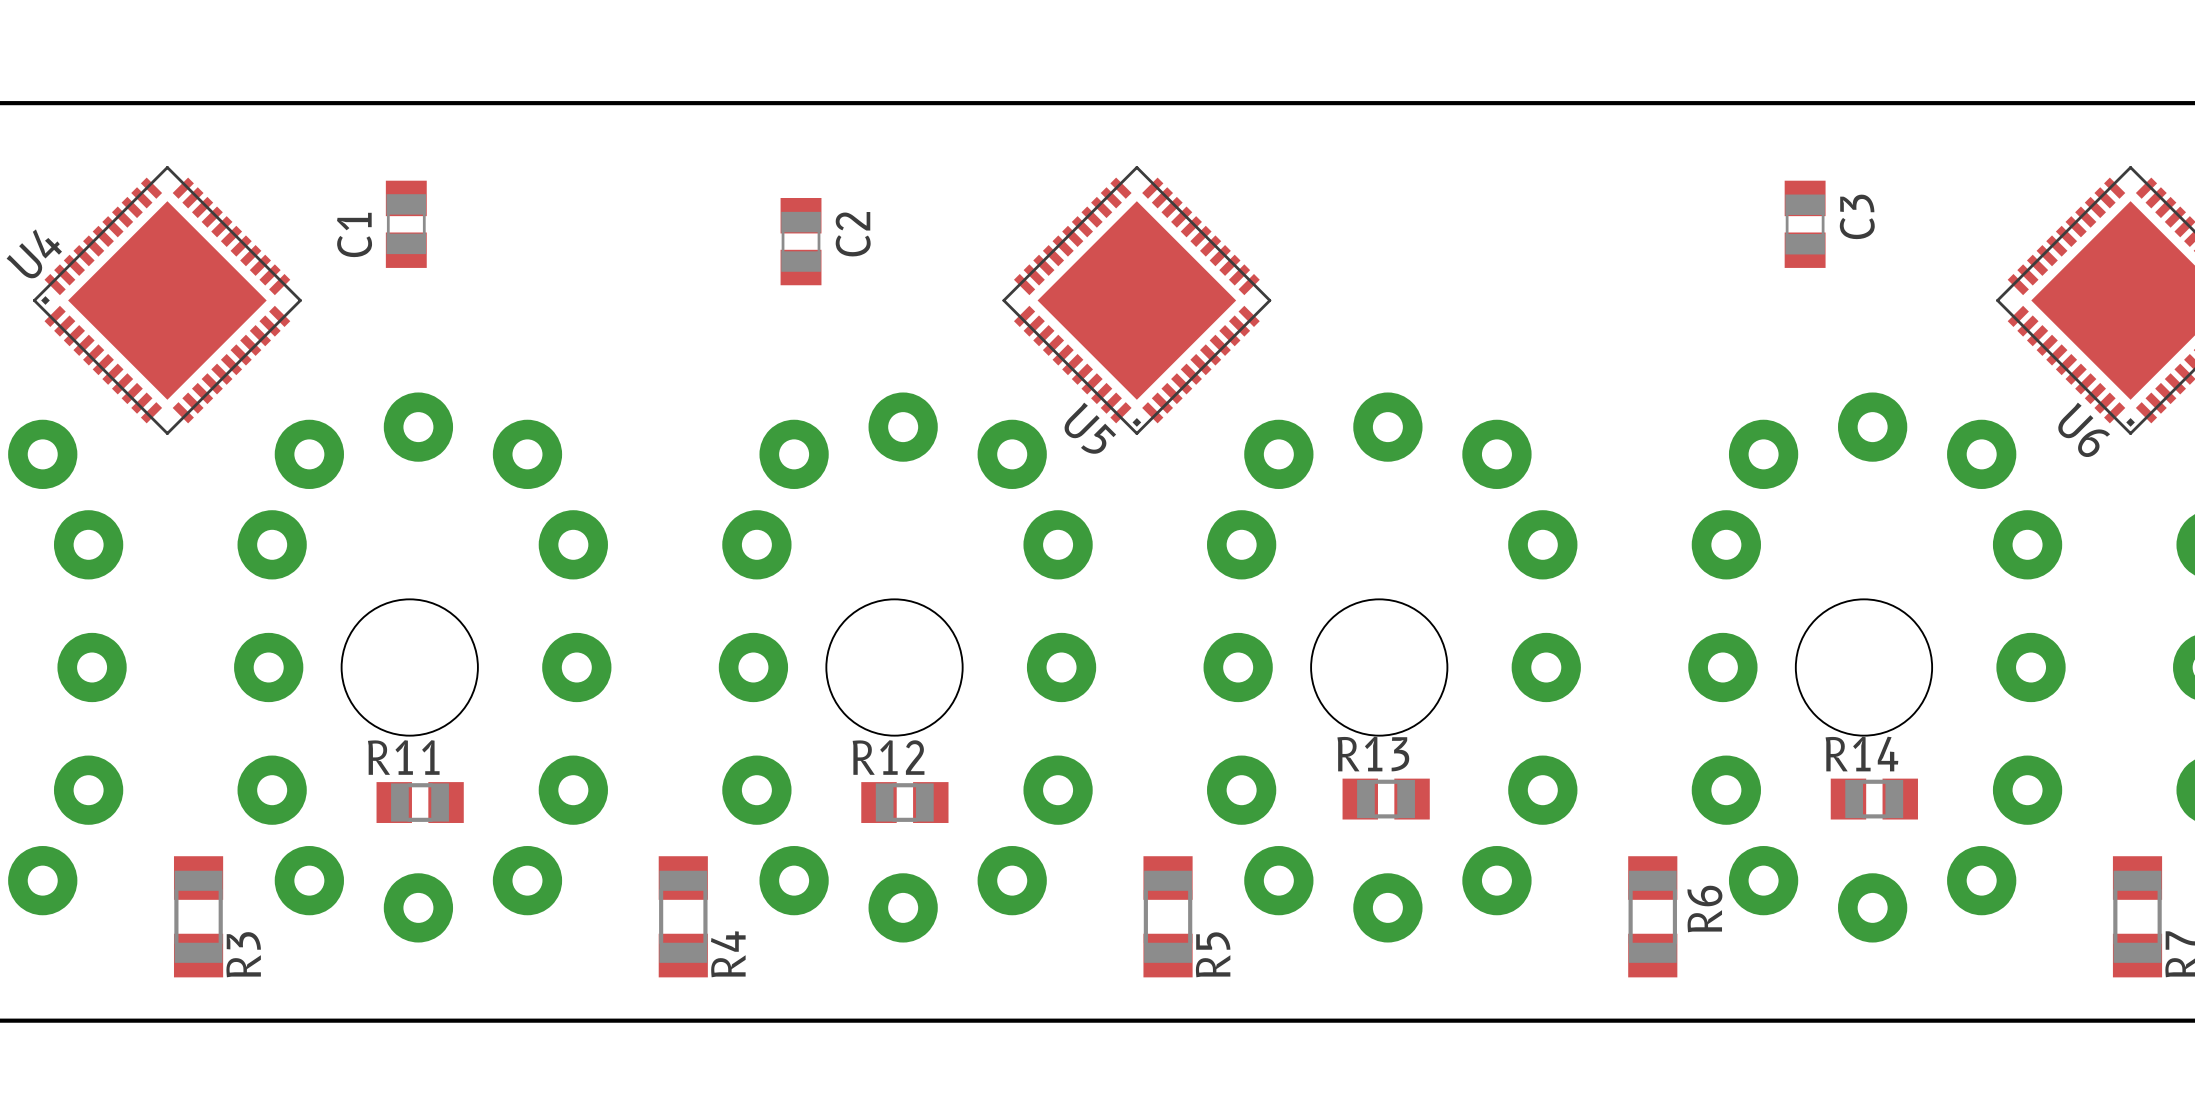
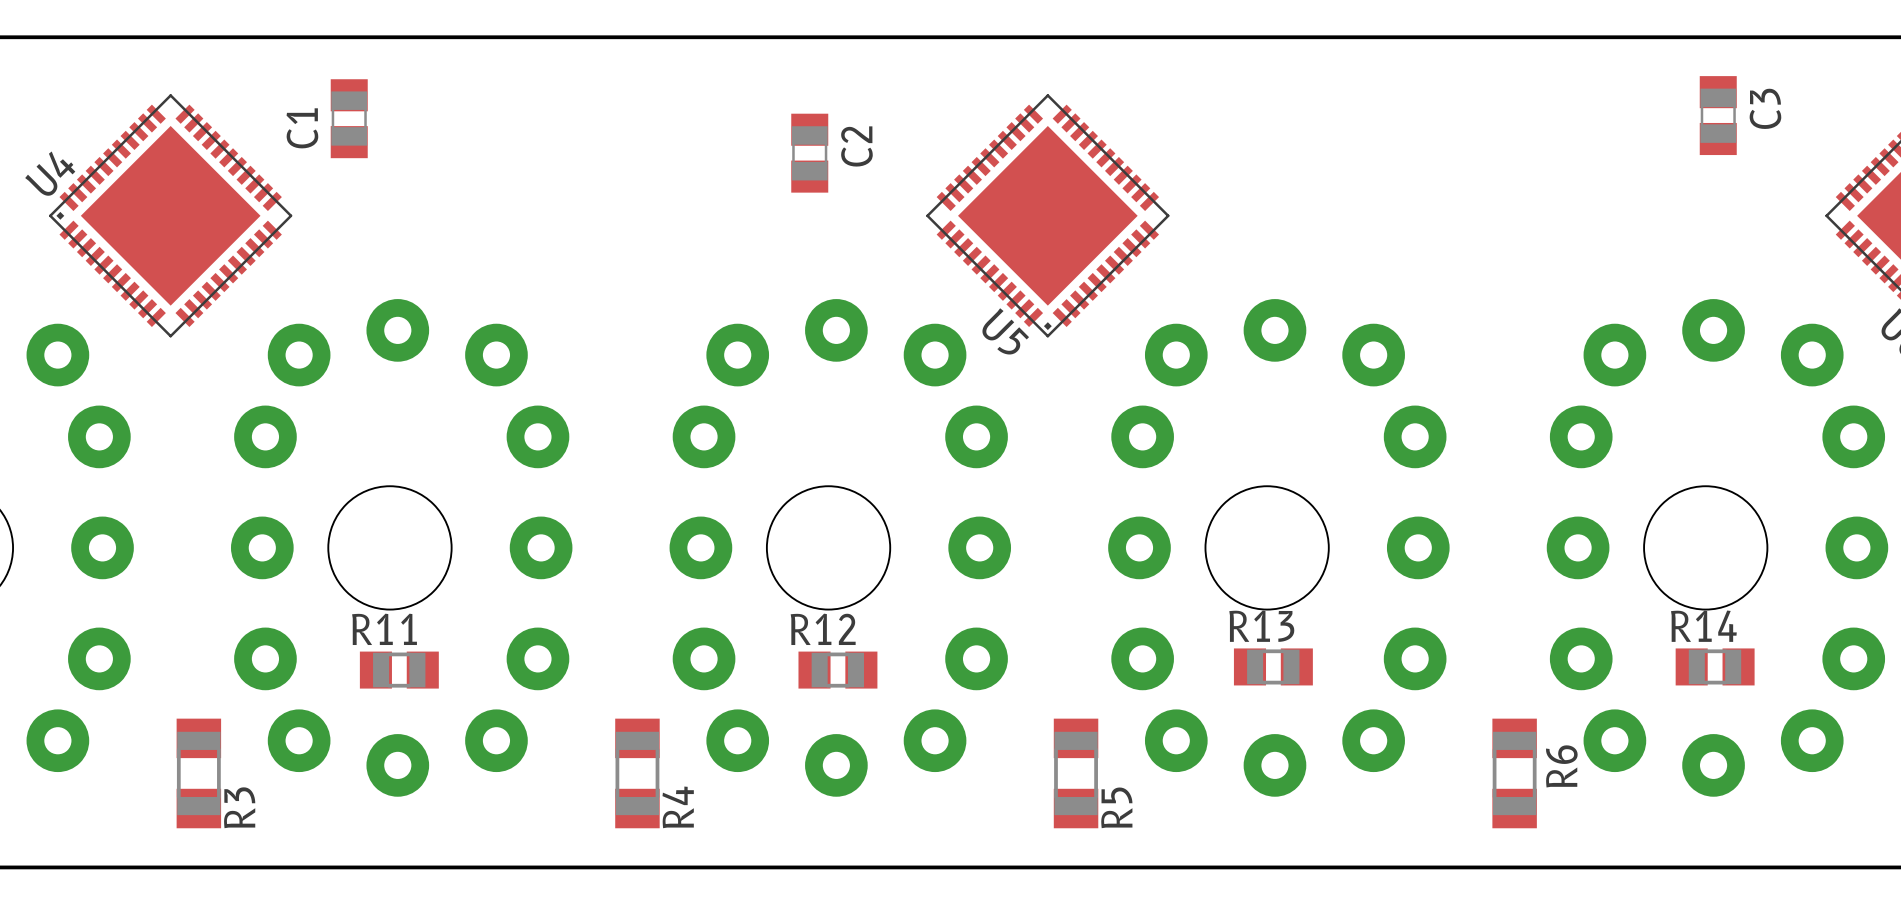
C1 position: (406, 224) -> (349, 118)
C3 position: (1805, 224) -> (1718, 115)
C2 position: (801, 241) -> (809, 153)

